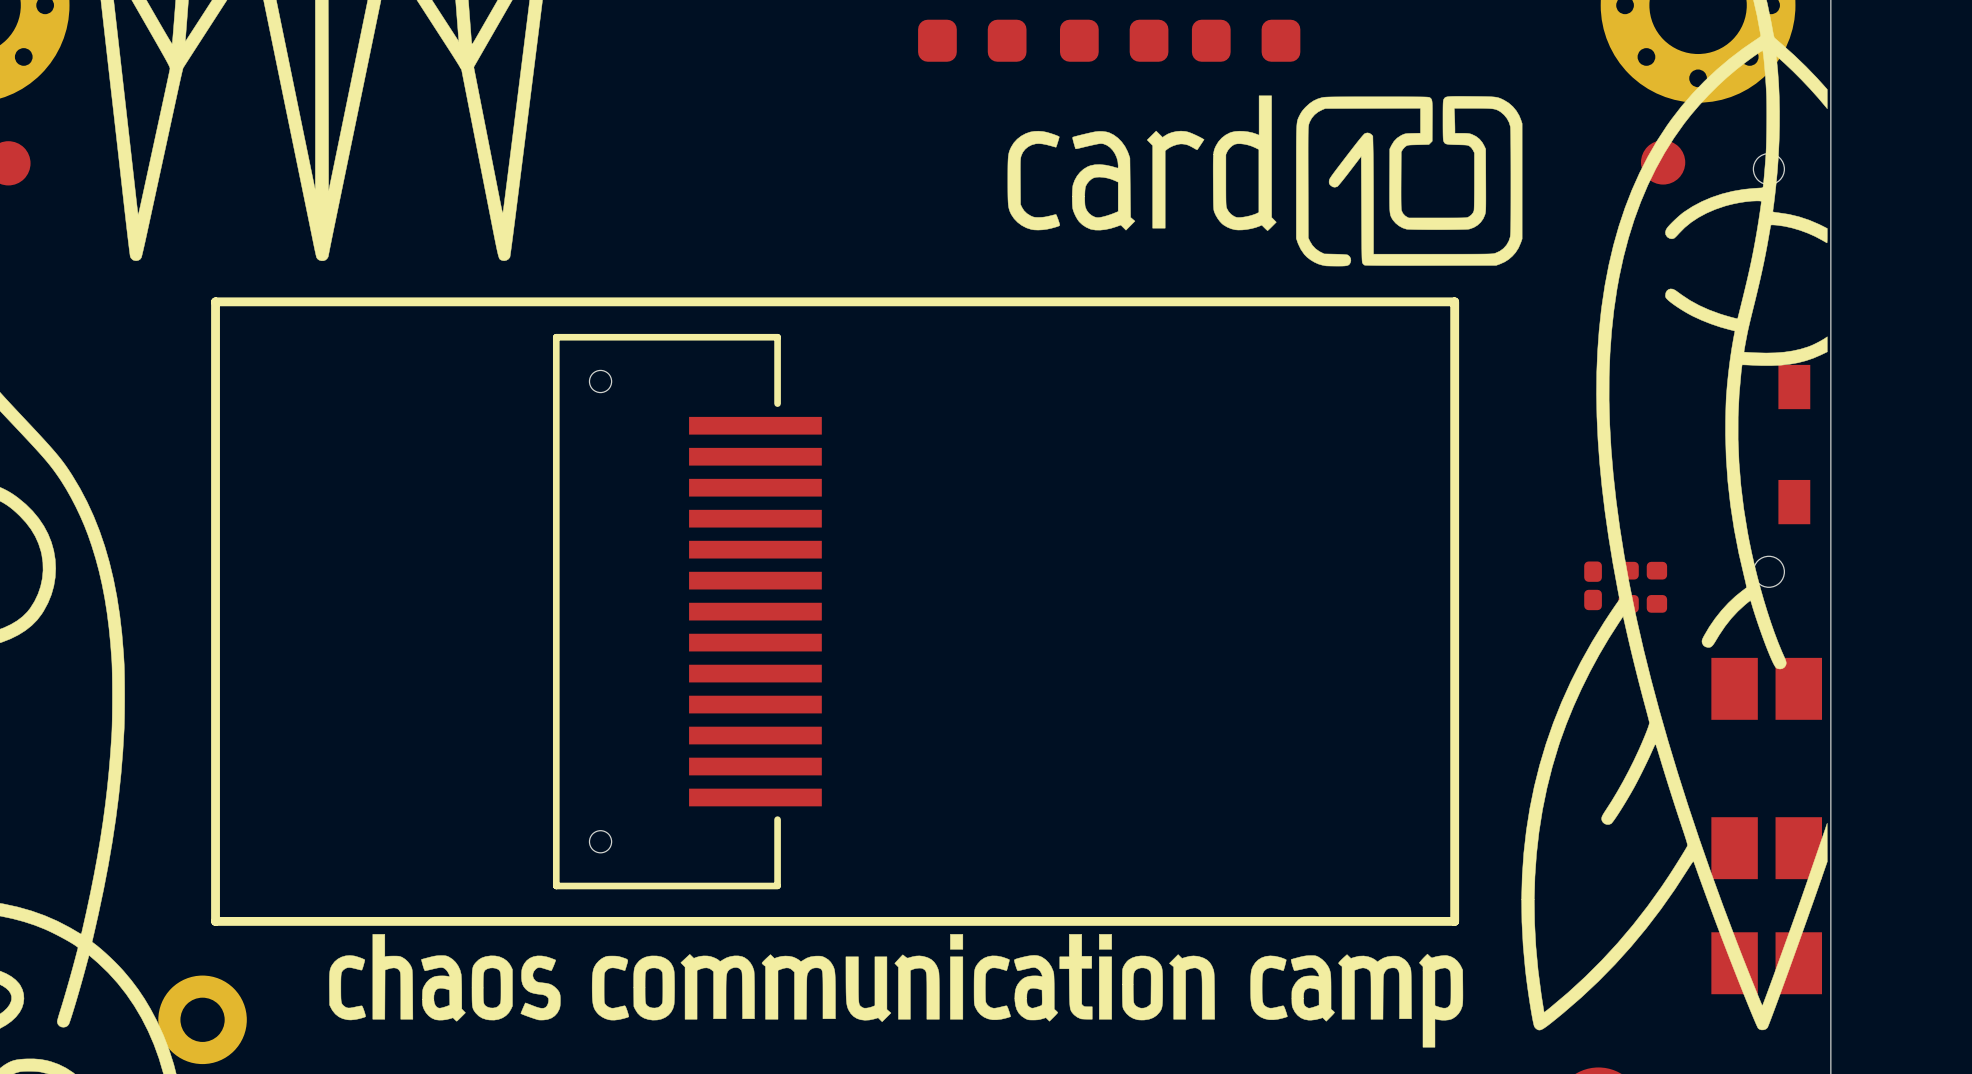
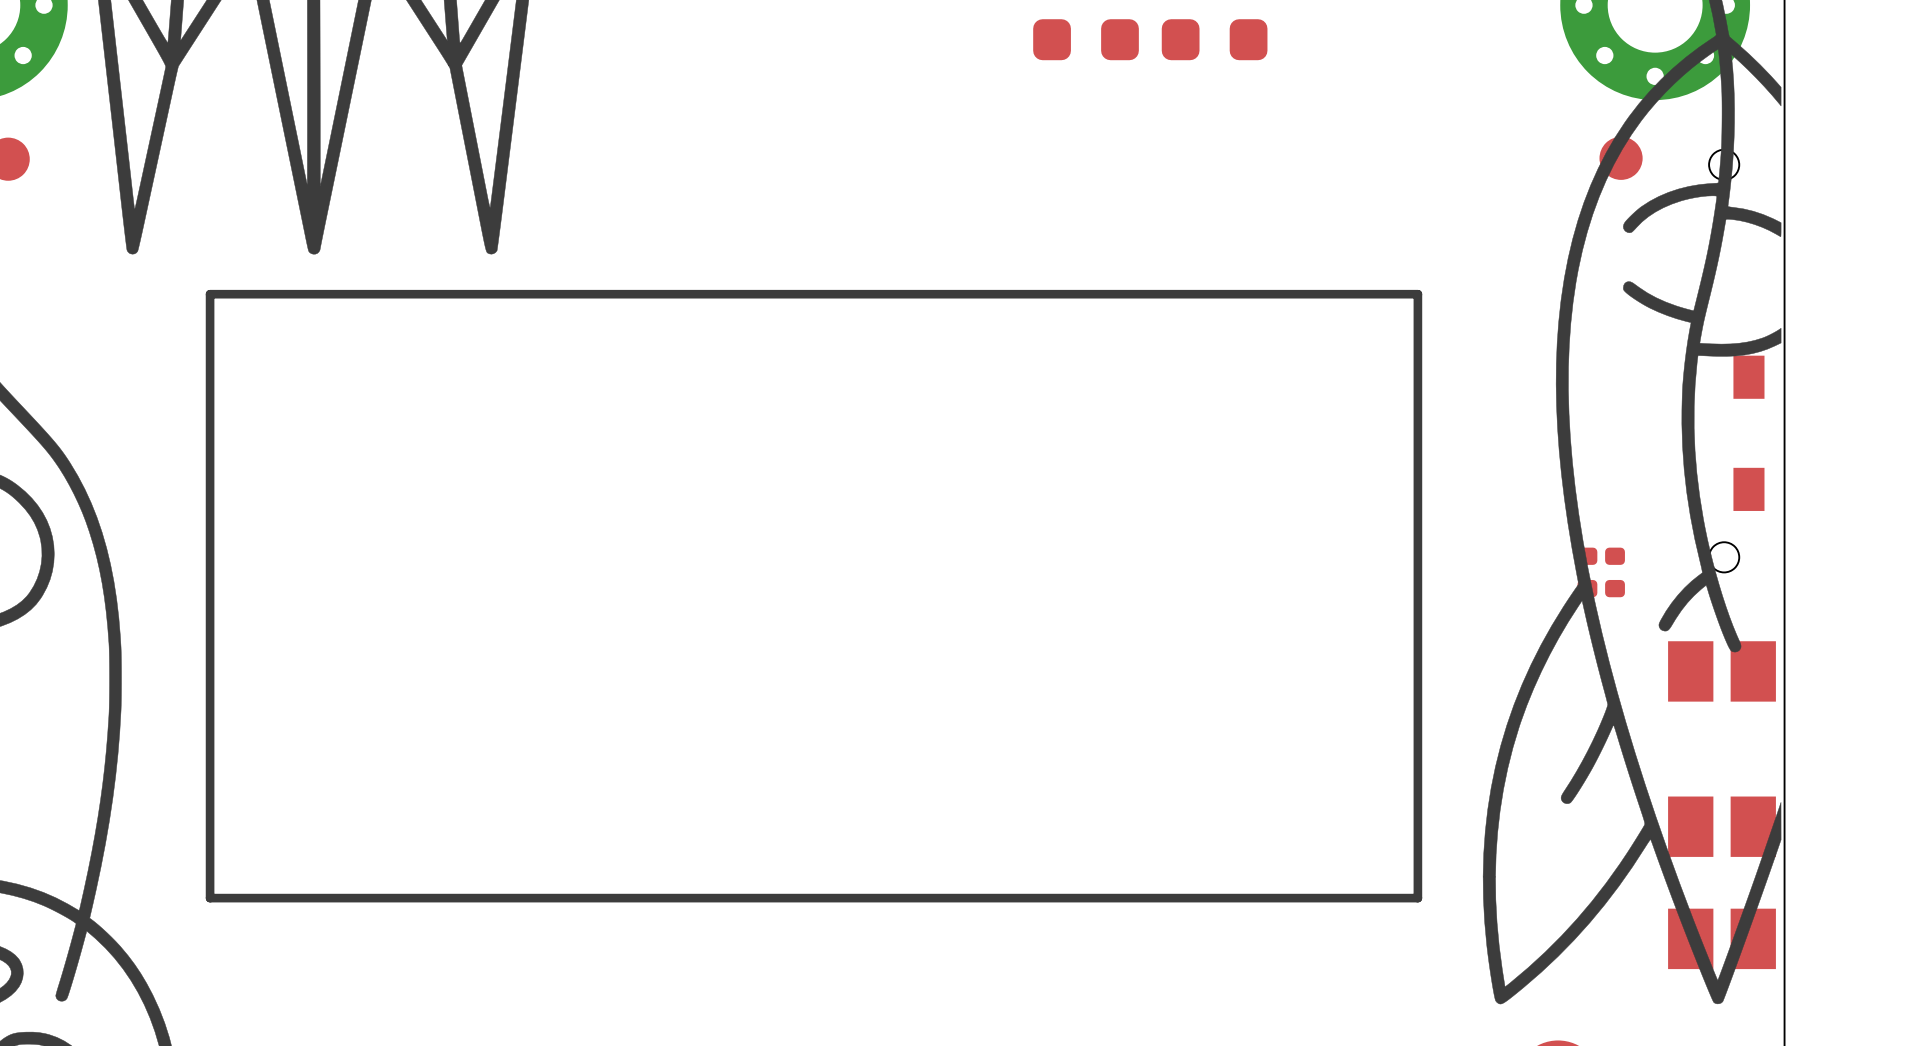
part: (972, 40) -> none
drawing: [329, 95, 1523, 1048] -> none
part: (1593, 585) -> none
part: (687, 611) -> none
part: (202, 1019) -> none

